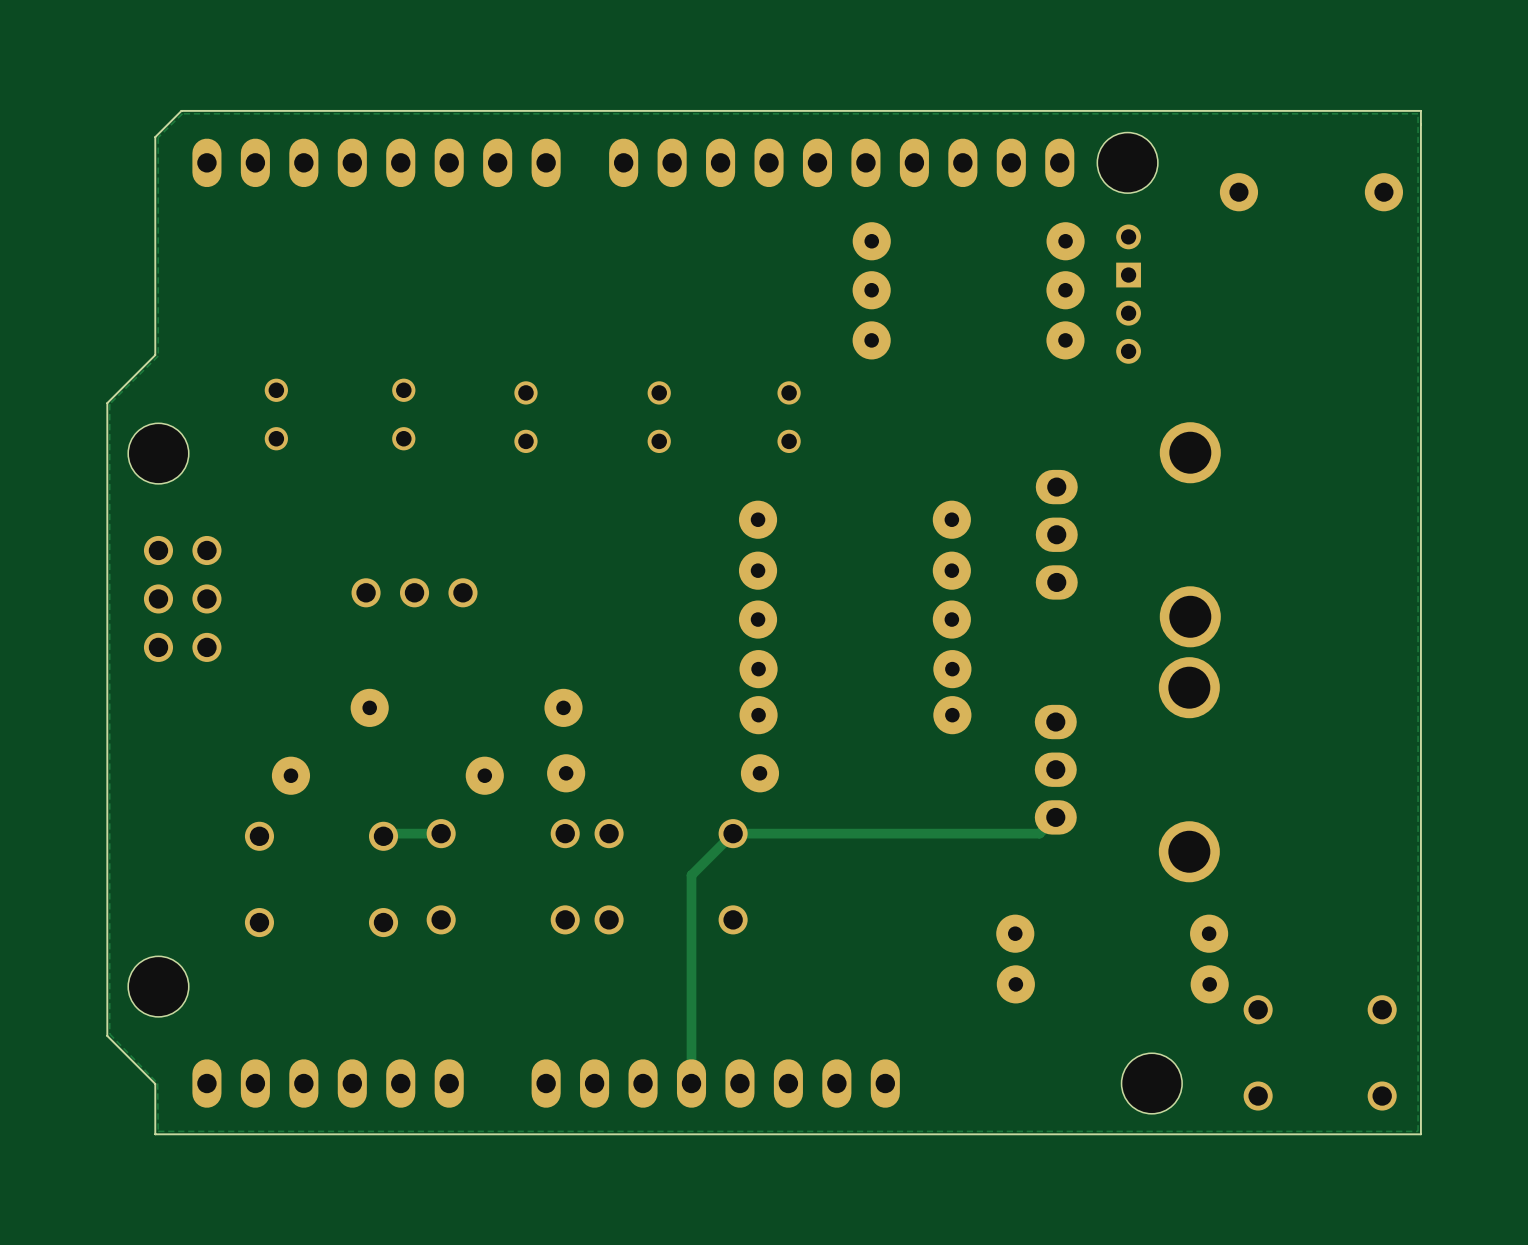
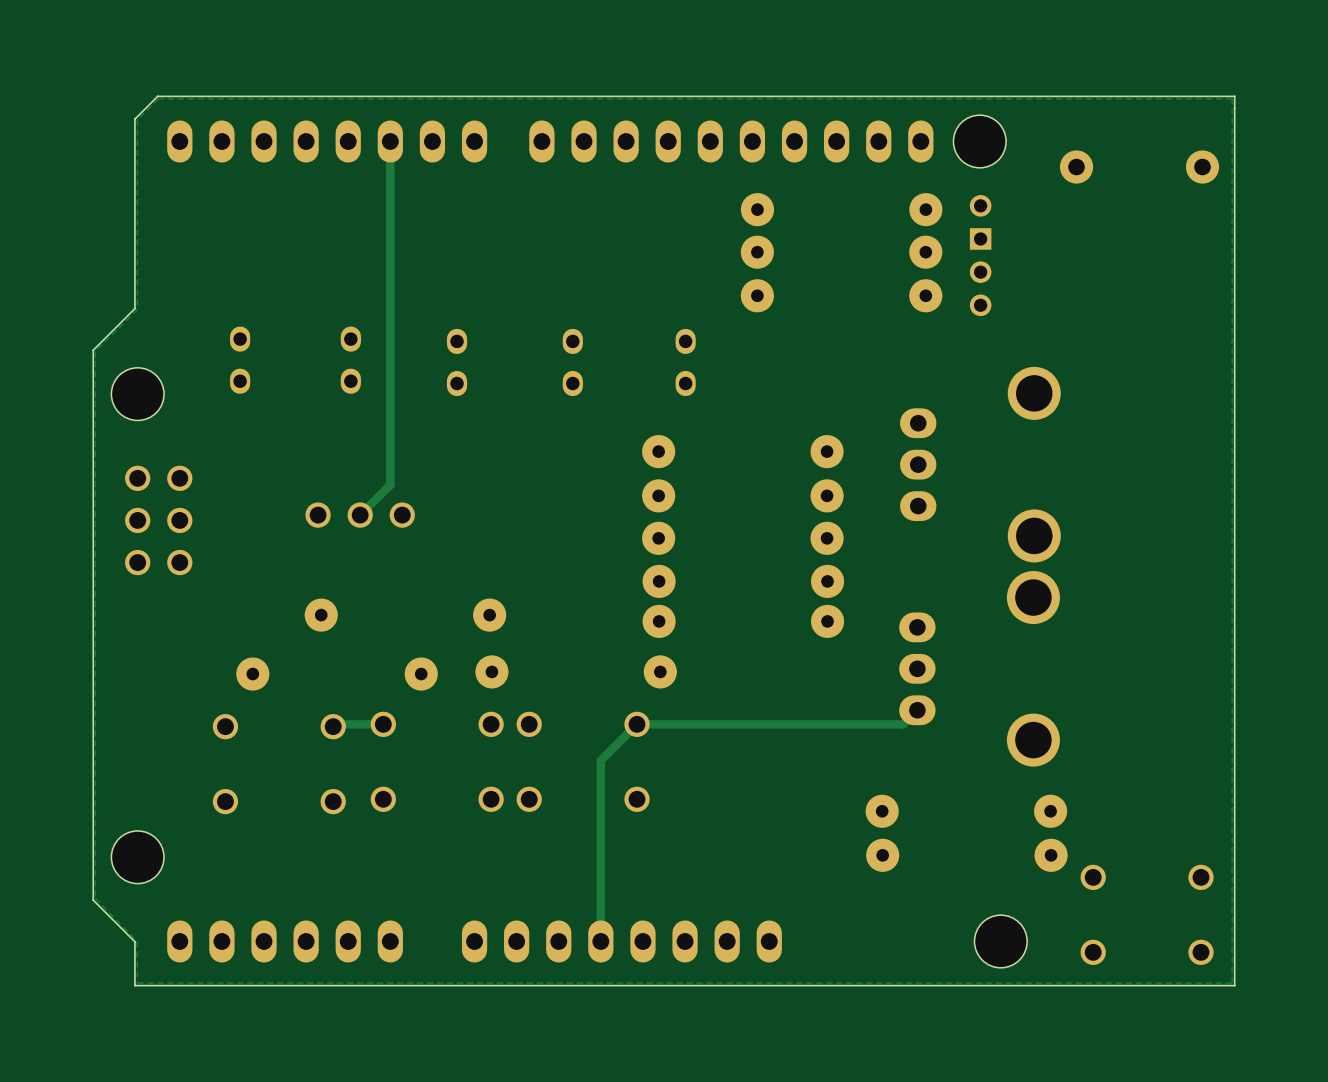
track: none -> (390, 141) (390, 484) (360, 515)
part footprint: [264, 378, 288, 451] -> [230, 326, 251, 394]
part footprint: [392, 378, 416, 451] -> [340, 326, 361, 394]
part footprint: [514, 381, 538, 454] -> [446, 328, 468, 397]
part footprint: [647, 381, 671, 454] -> [562, 328, 583, 397]
part footprint: [777, 381, 801, 454] -> [675, 328, 696, 397]

